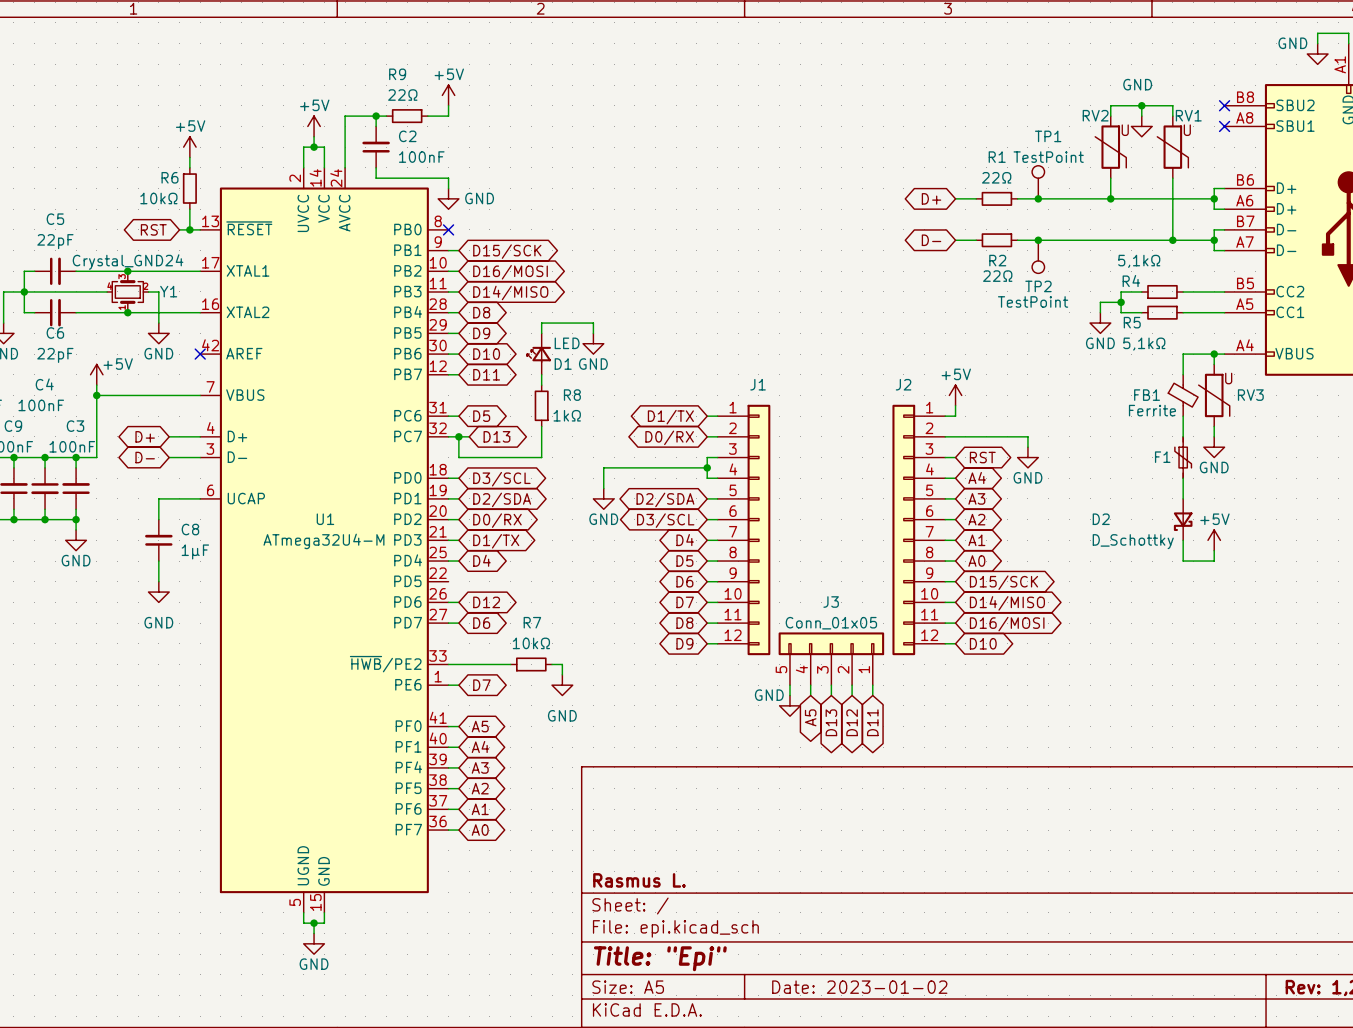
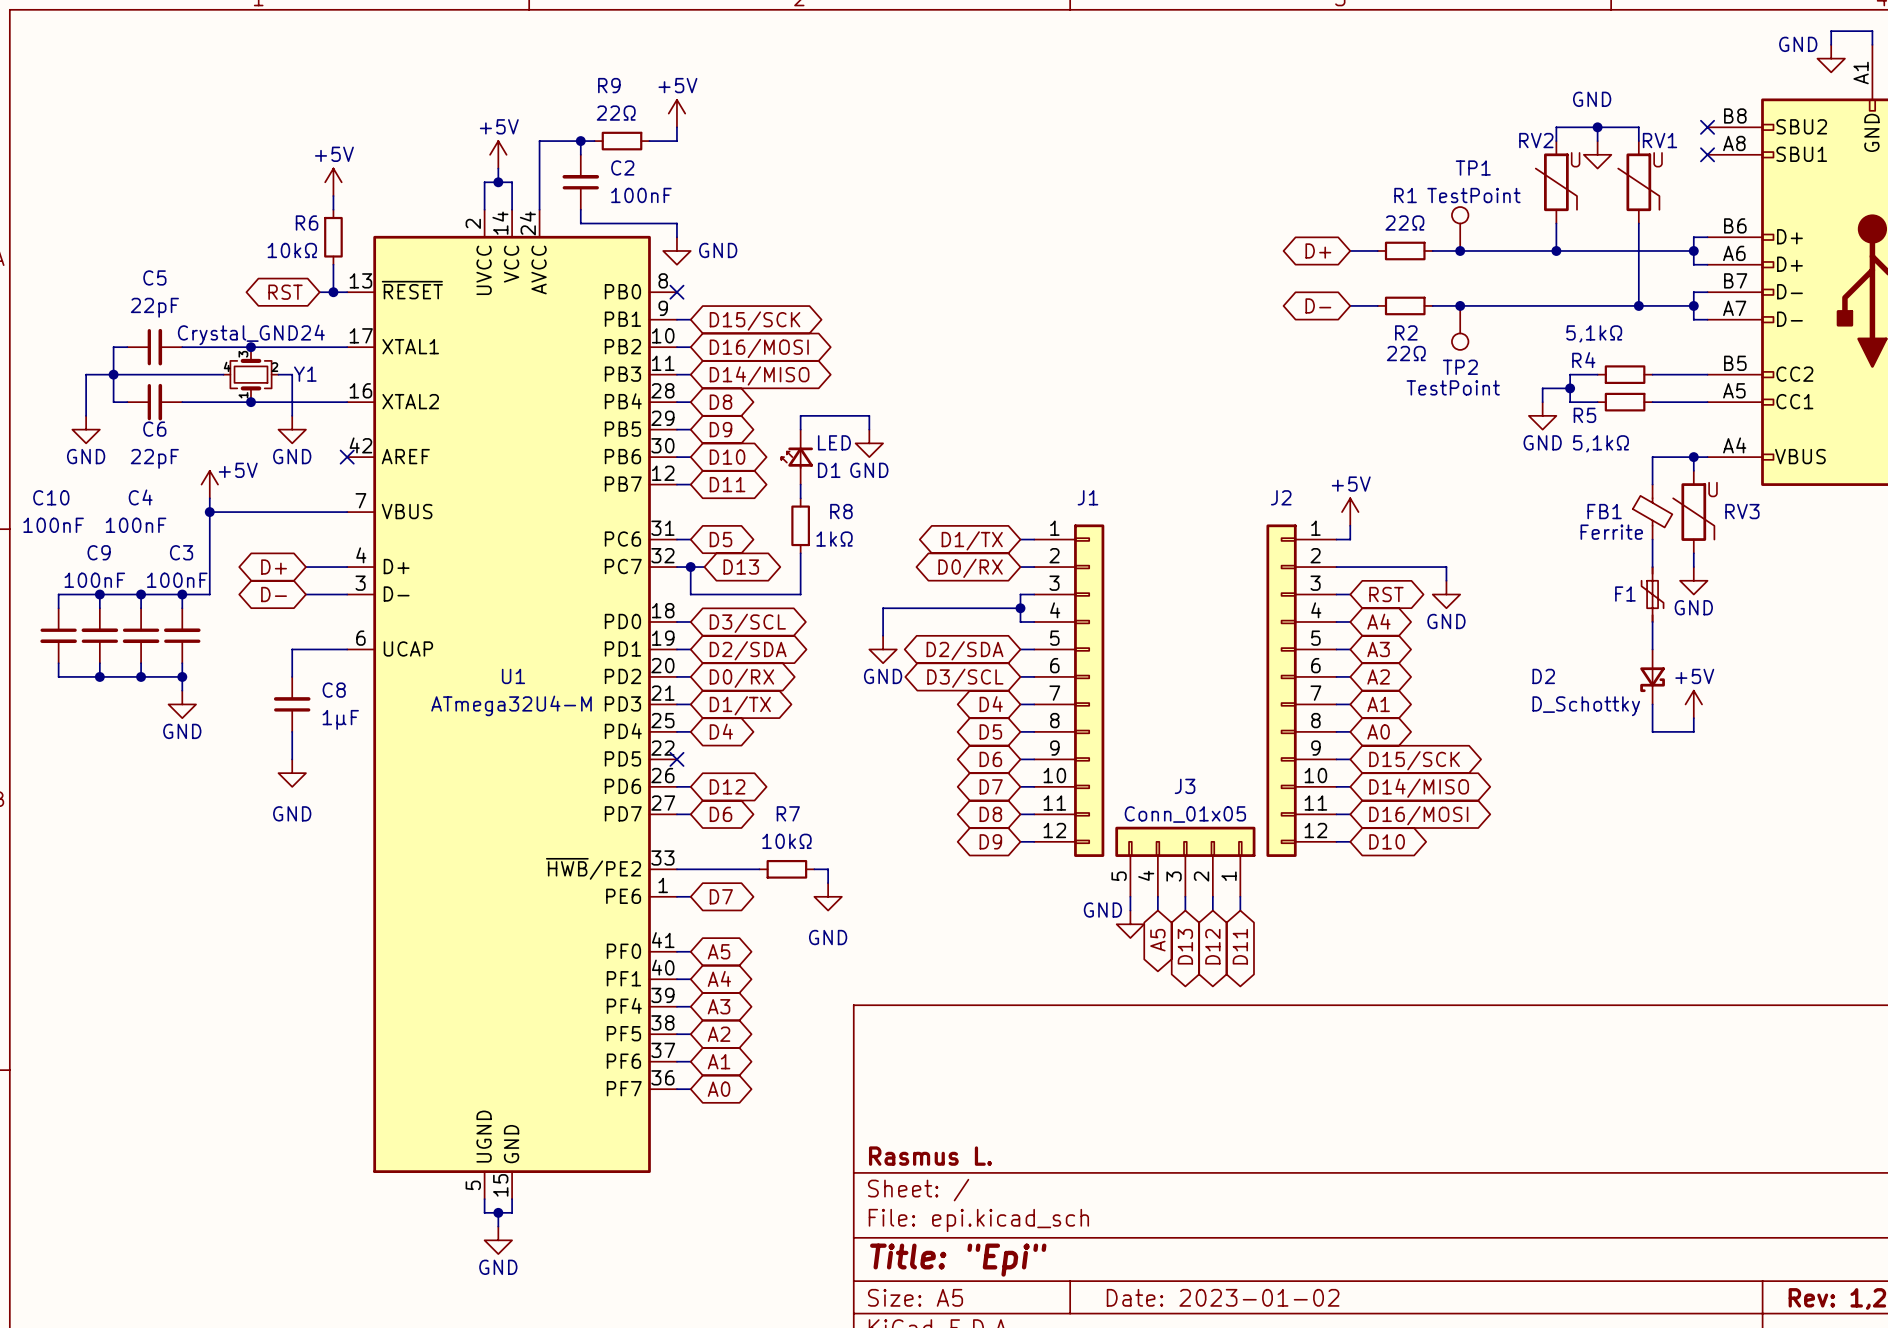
no-connect mark: none -> (676, 759)

